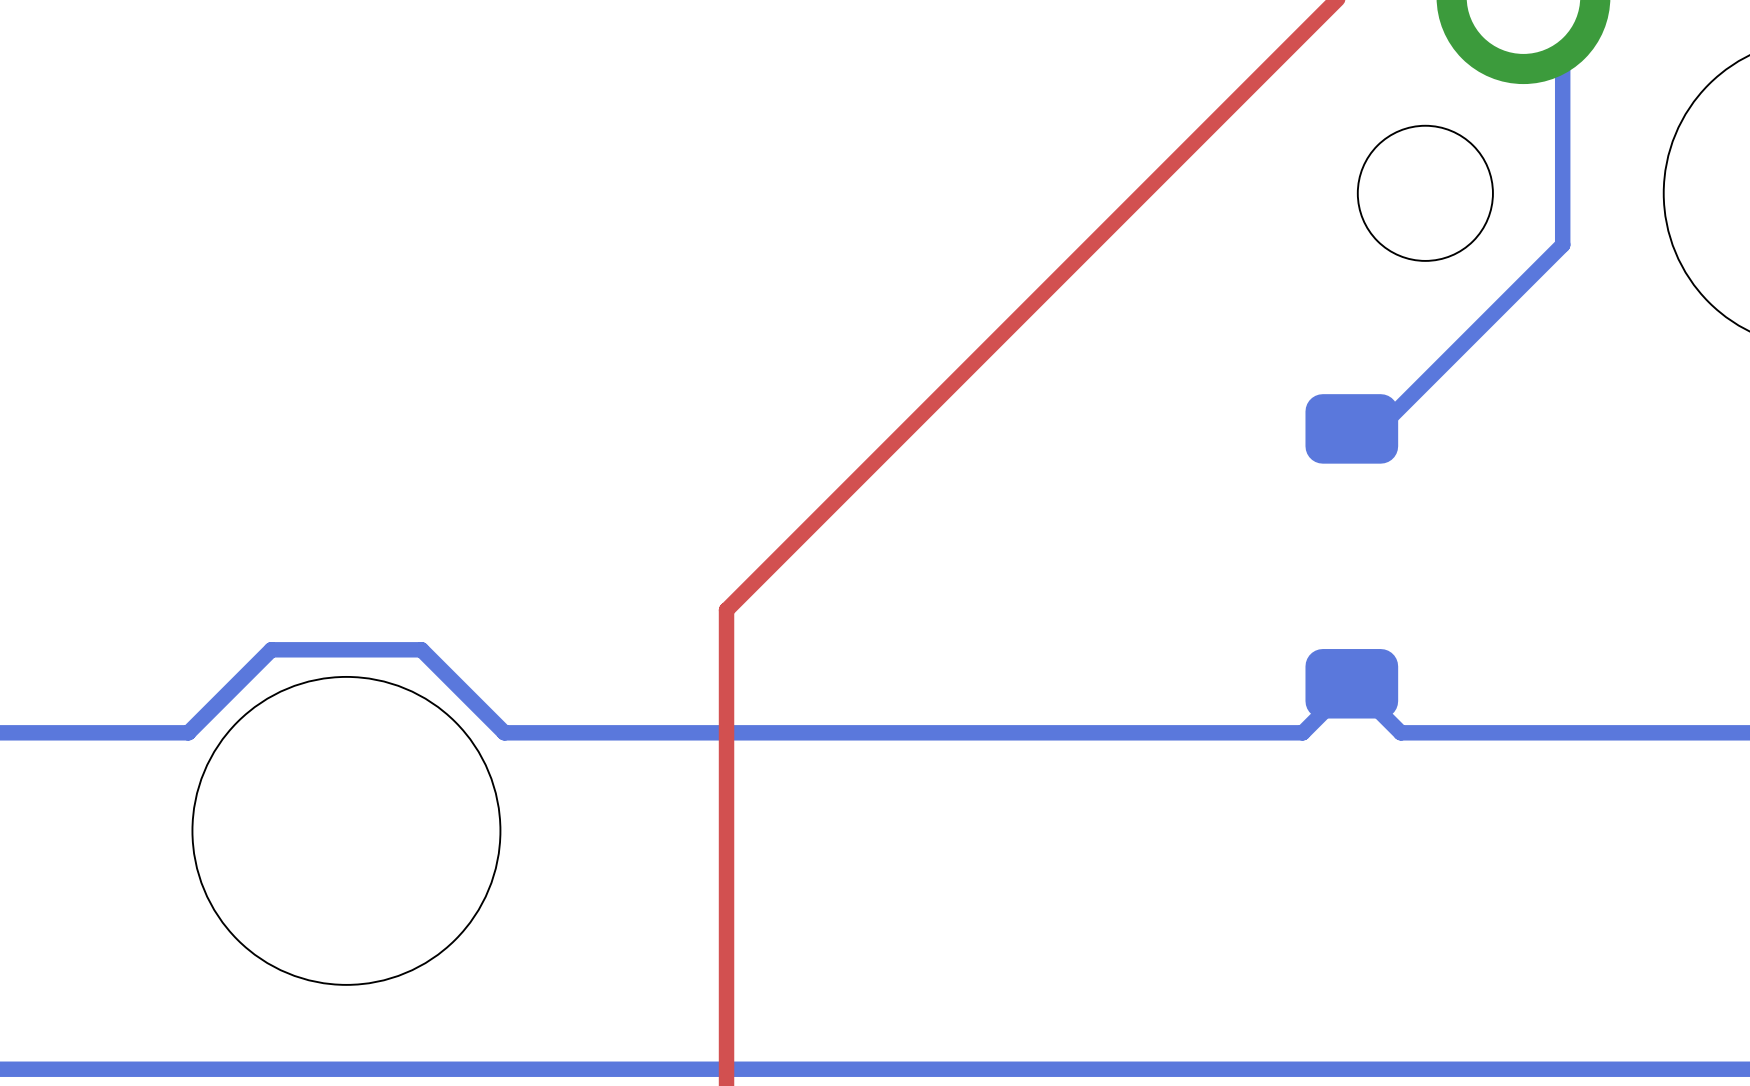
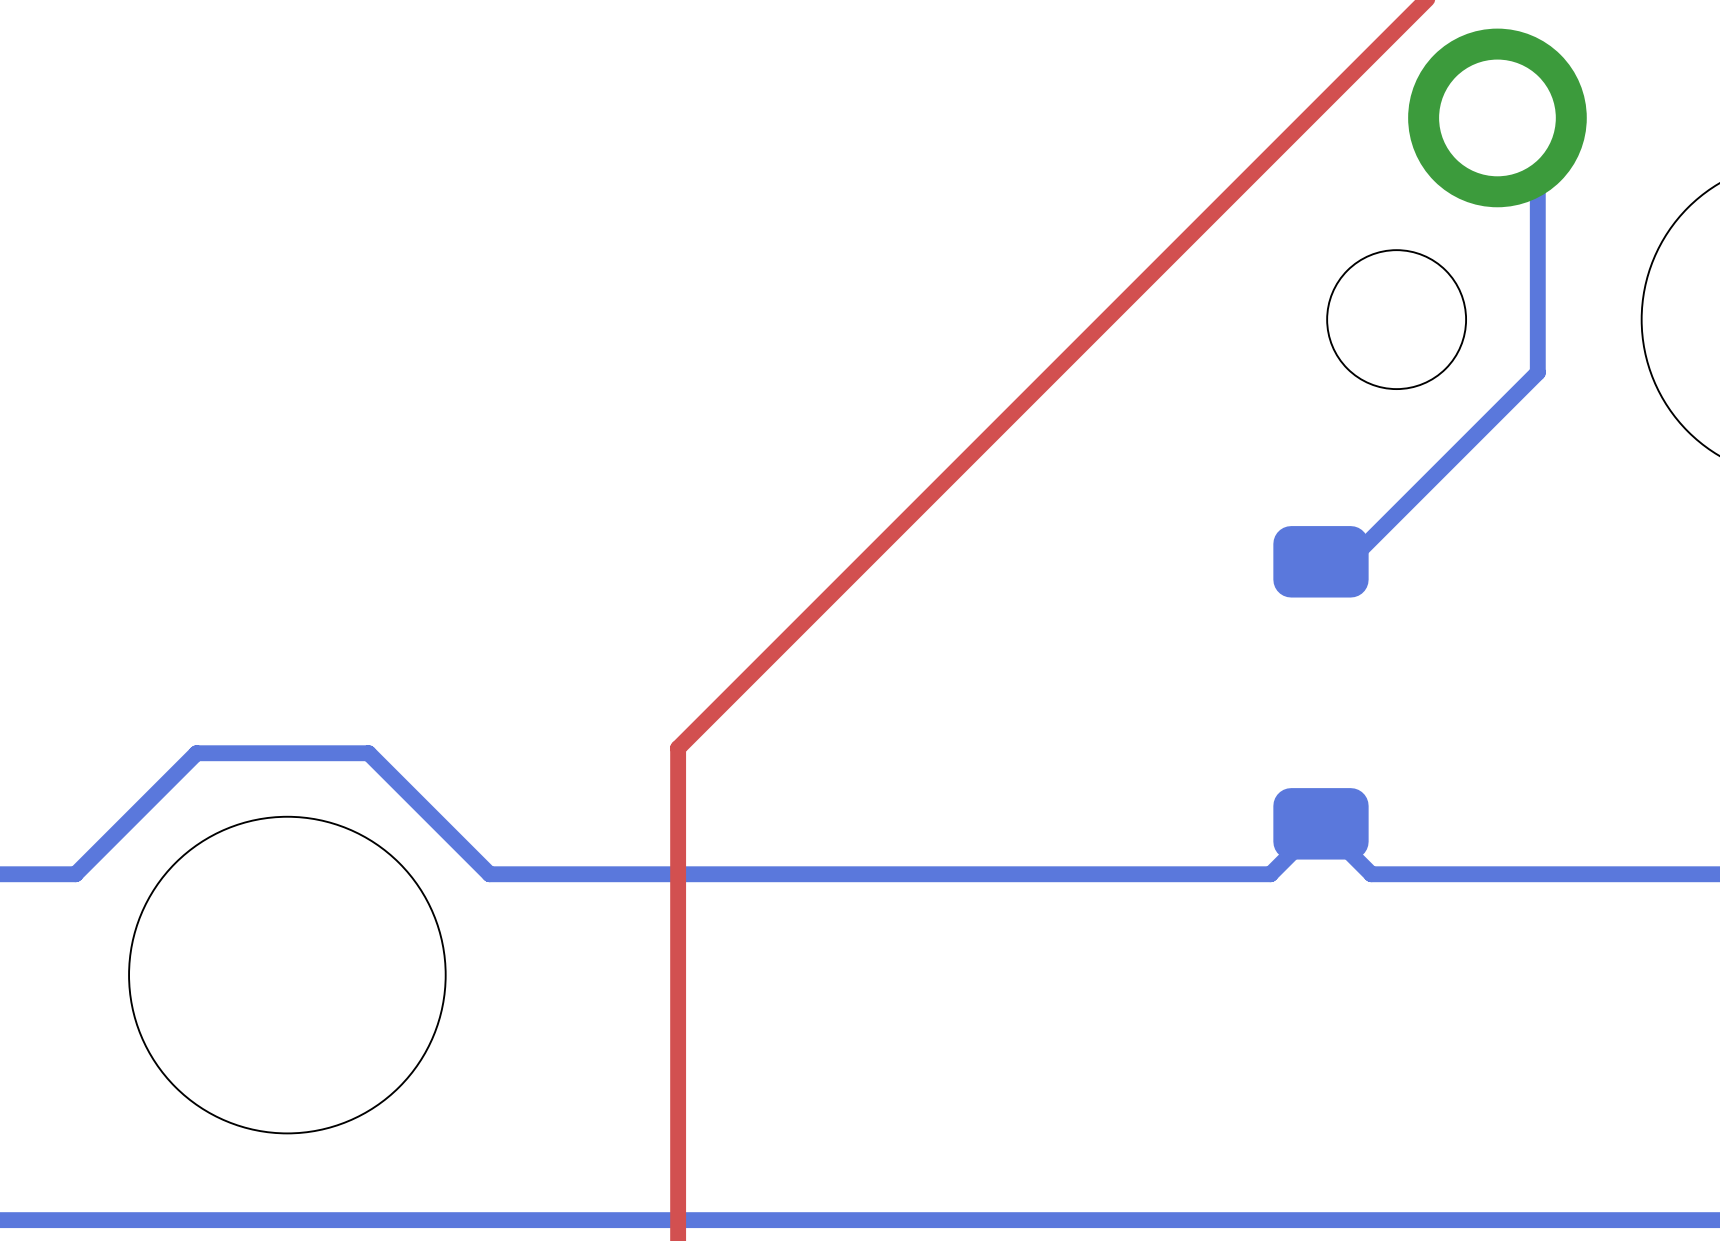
bottom track: (140, 732) (188, 732) (271, 649) (421, 649) (504, 732) (543, 732) -> (75, 874) (196, 753) (368, 753) (489, 874)

